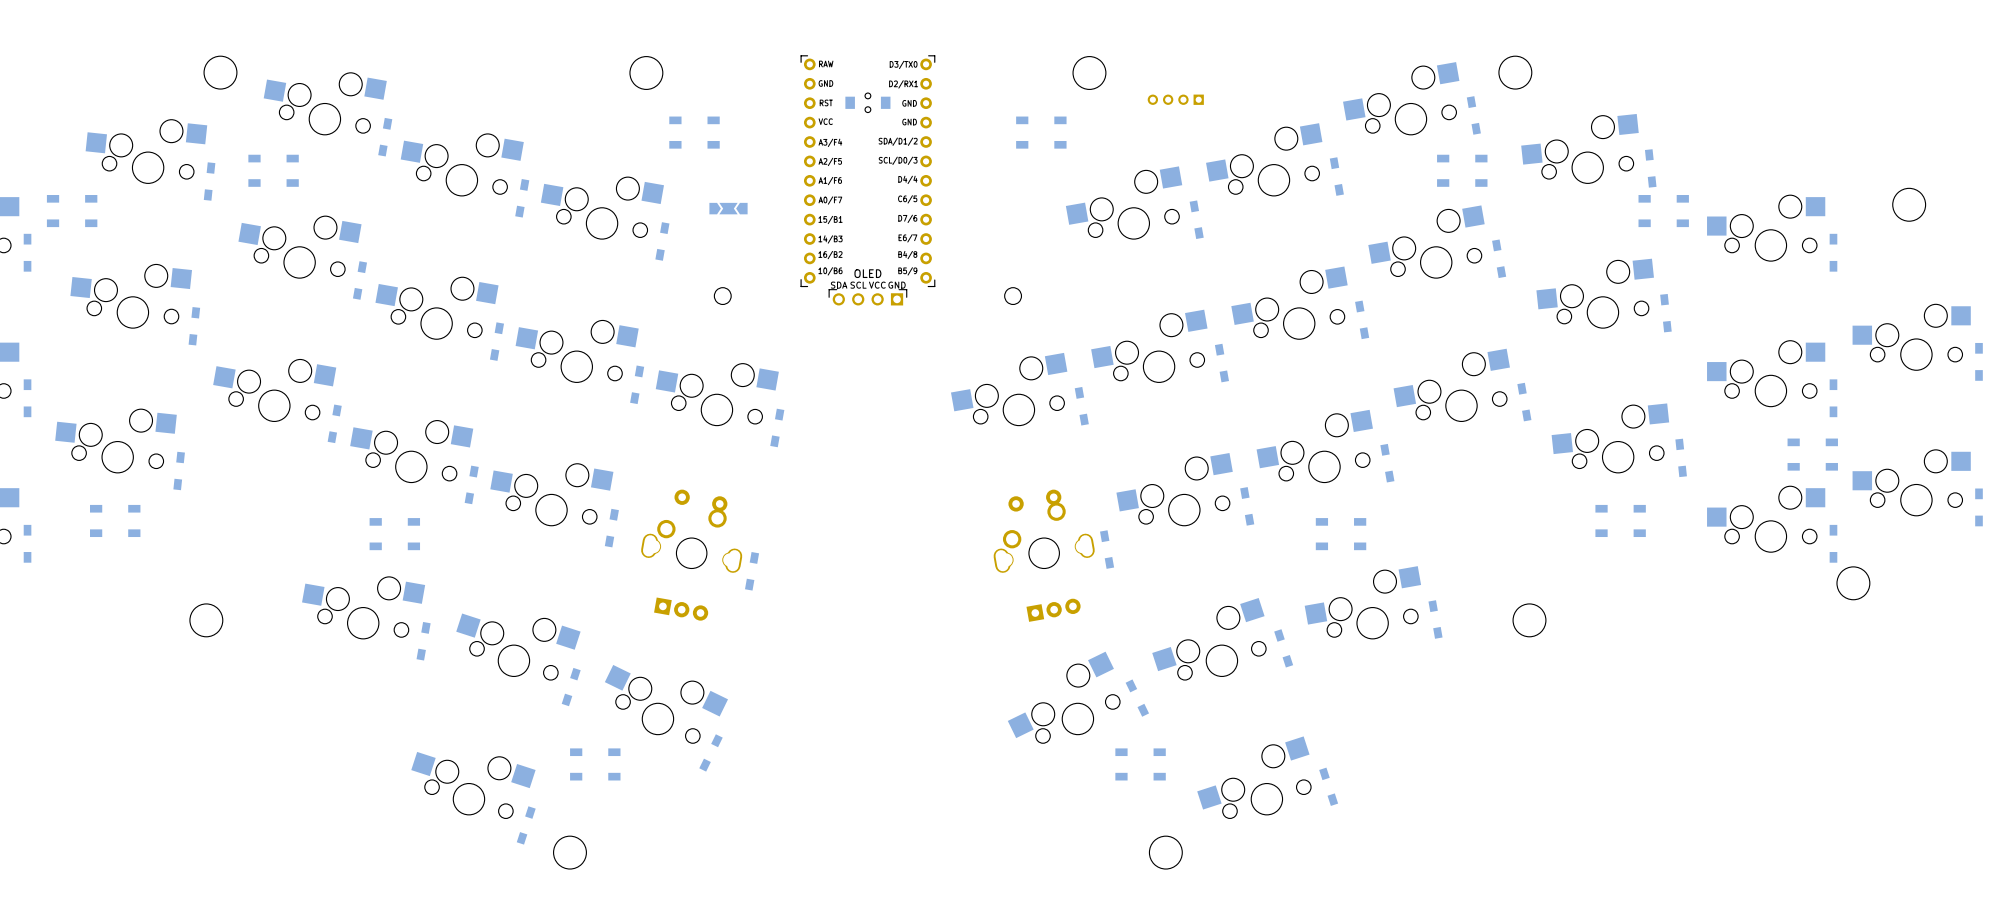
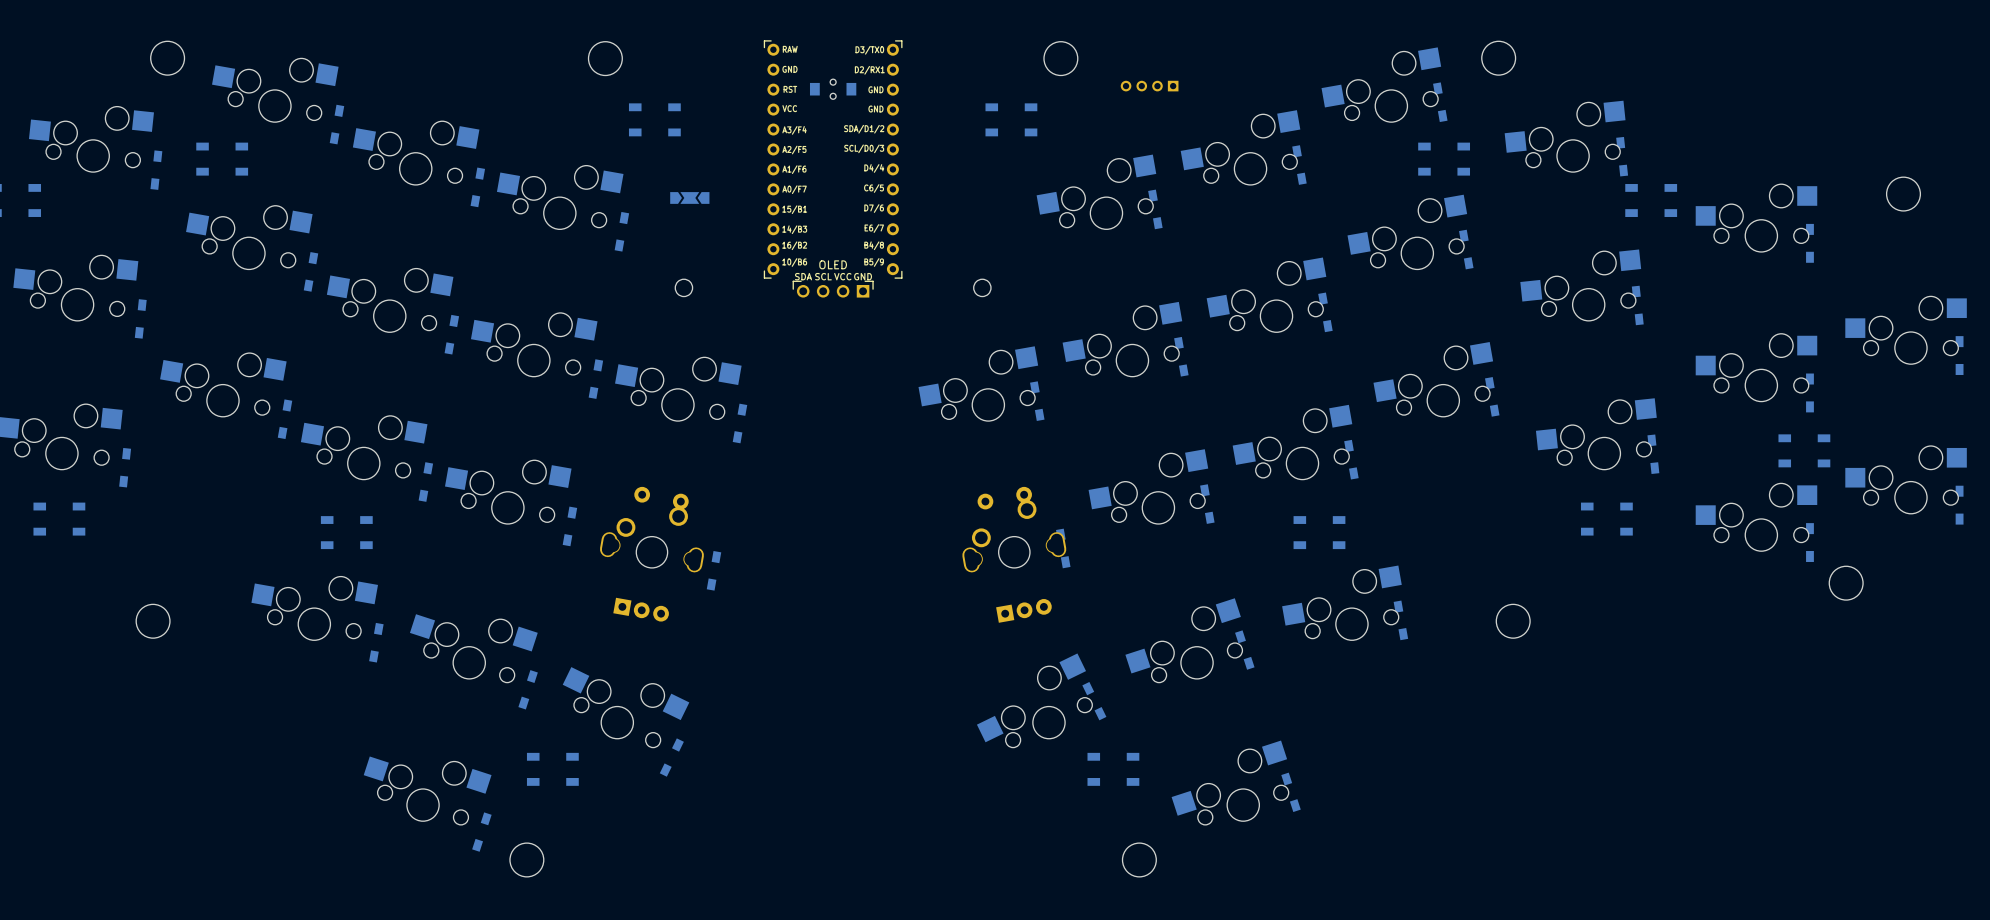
part position: (1473, 115) -> (1440, 102)
part position: (1650, 168) -> (1622, 156)
part position: (1336, 176) -> (1299, 165)
part position: (1196, 219) -> (1155, 209)
part position: (1833, 252) -> (1809, 243)
part position: (1499, 258) -> (1466, 249)
part position: (1665, 313) -> (1637, 305)
part position: (1362, 319) -> (1325, 312)
part position: (1979, 361) -> (1959, 355)
part position: (1221, 363) -> (1181, 356)
part position: (1833, 398) -> (1809, 392)
part position: (1524, 402) -> (1492, 396)
part position: (1081, 406) -> (1037, 401)
part position: (1681, 457) -> (1653, 454)
part position: (1387, 463) -> (1351, 459)
part position: (1247, 506) -> (1207, 504)
part position: (1979, 507) -> (1959, 505)
part position: (1833, 543) -> (1809, 542)
part position: (1107, 549) -> (1063, 548)
part position: (1435, 619) -> (1400, 620)
part position: (1283, 648) -> (1244, 650)
part position: (1137, 698) -> (1094, 701)
part position: (1328, 786) -> (1291, 792)

